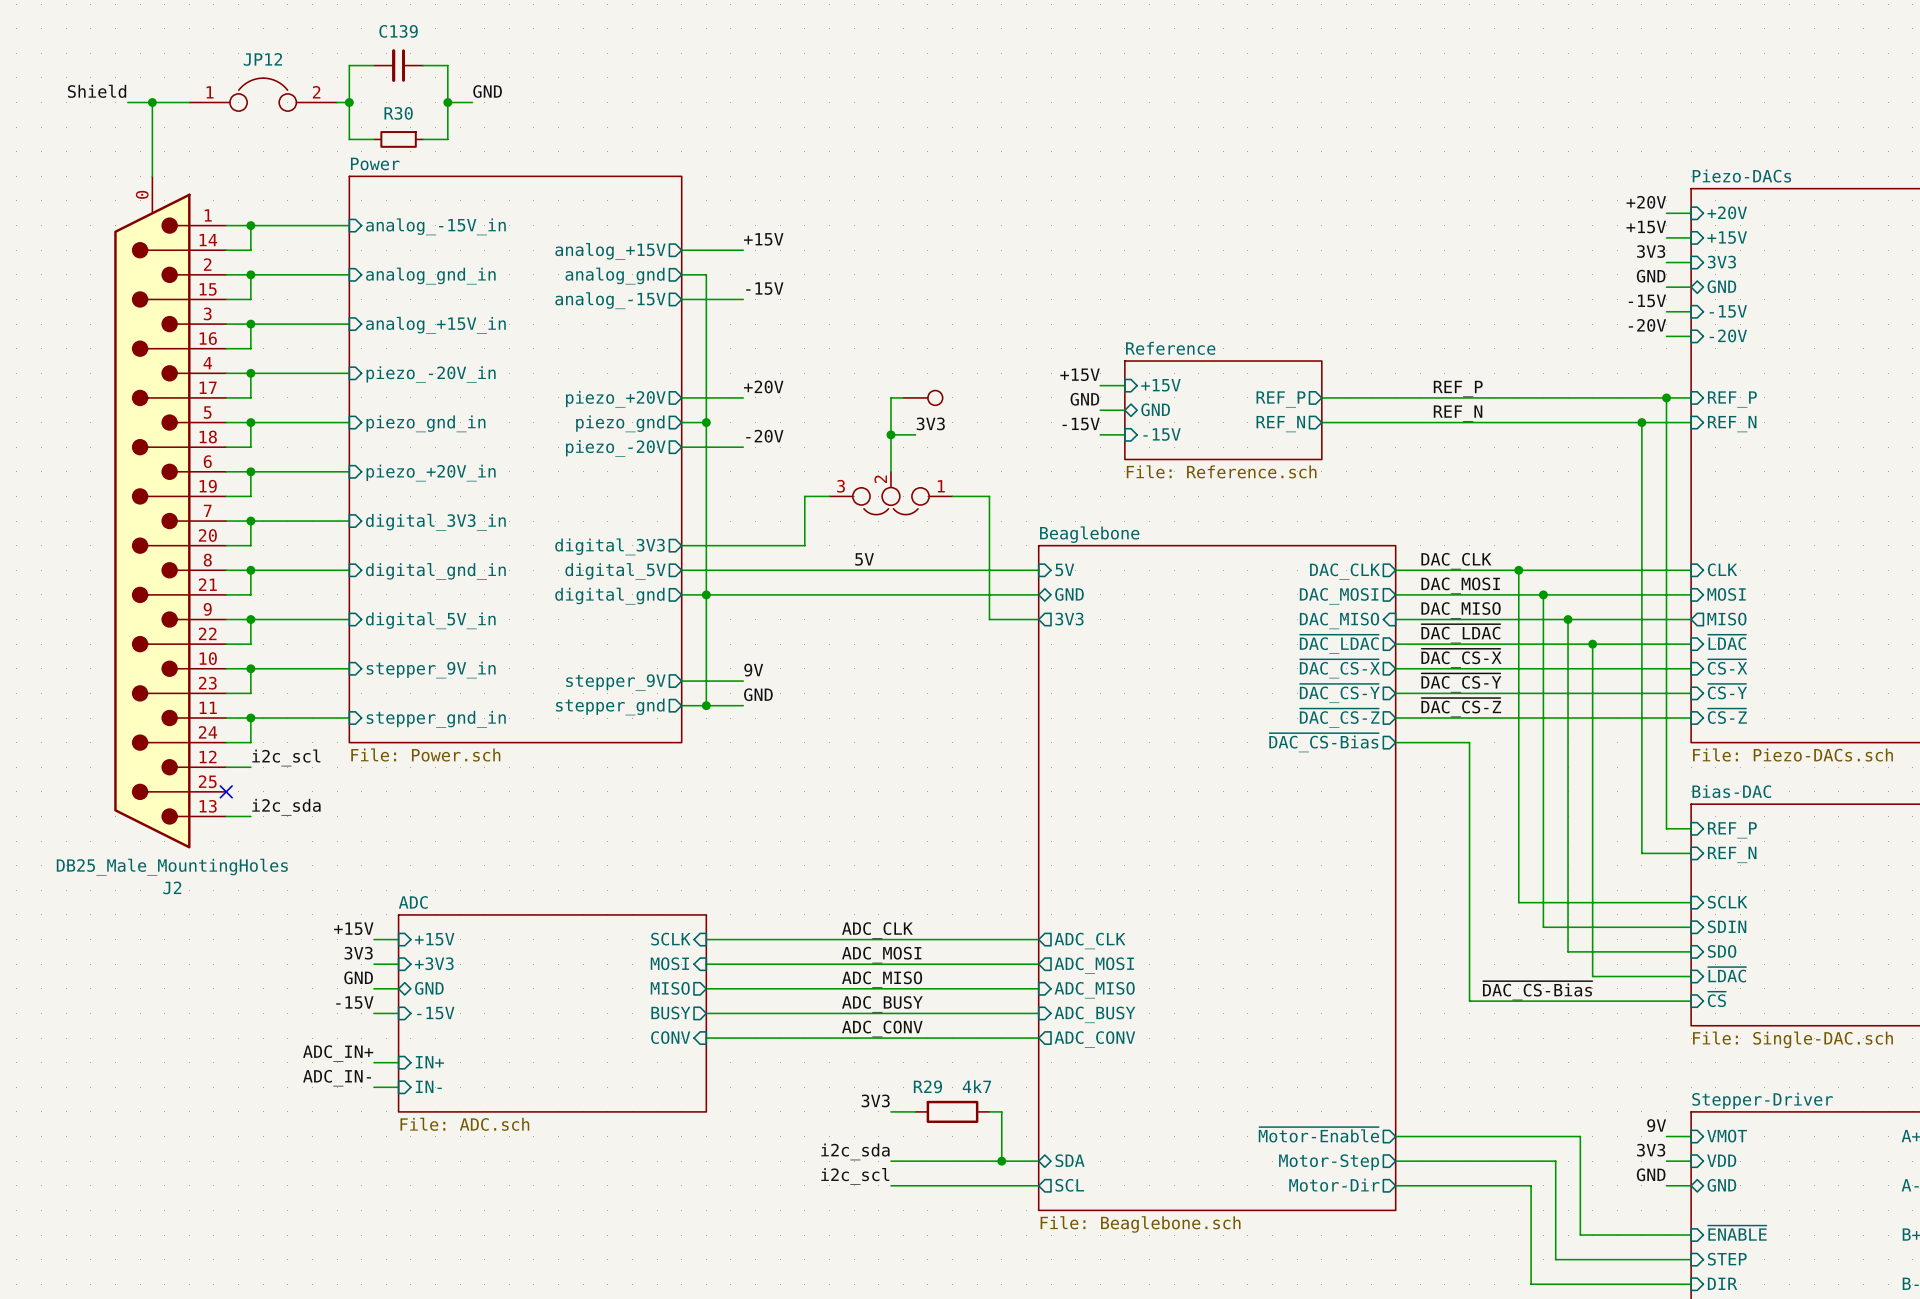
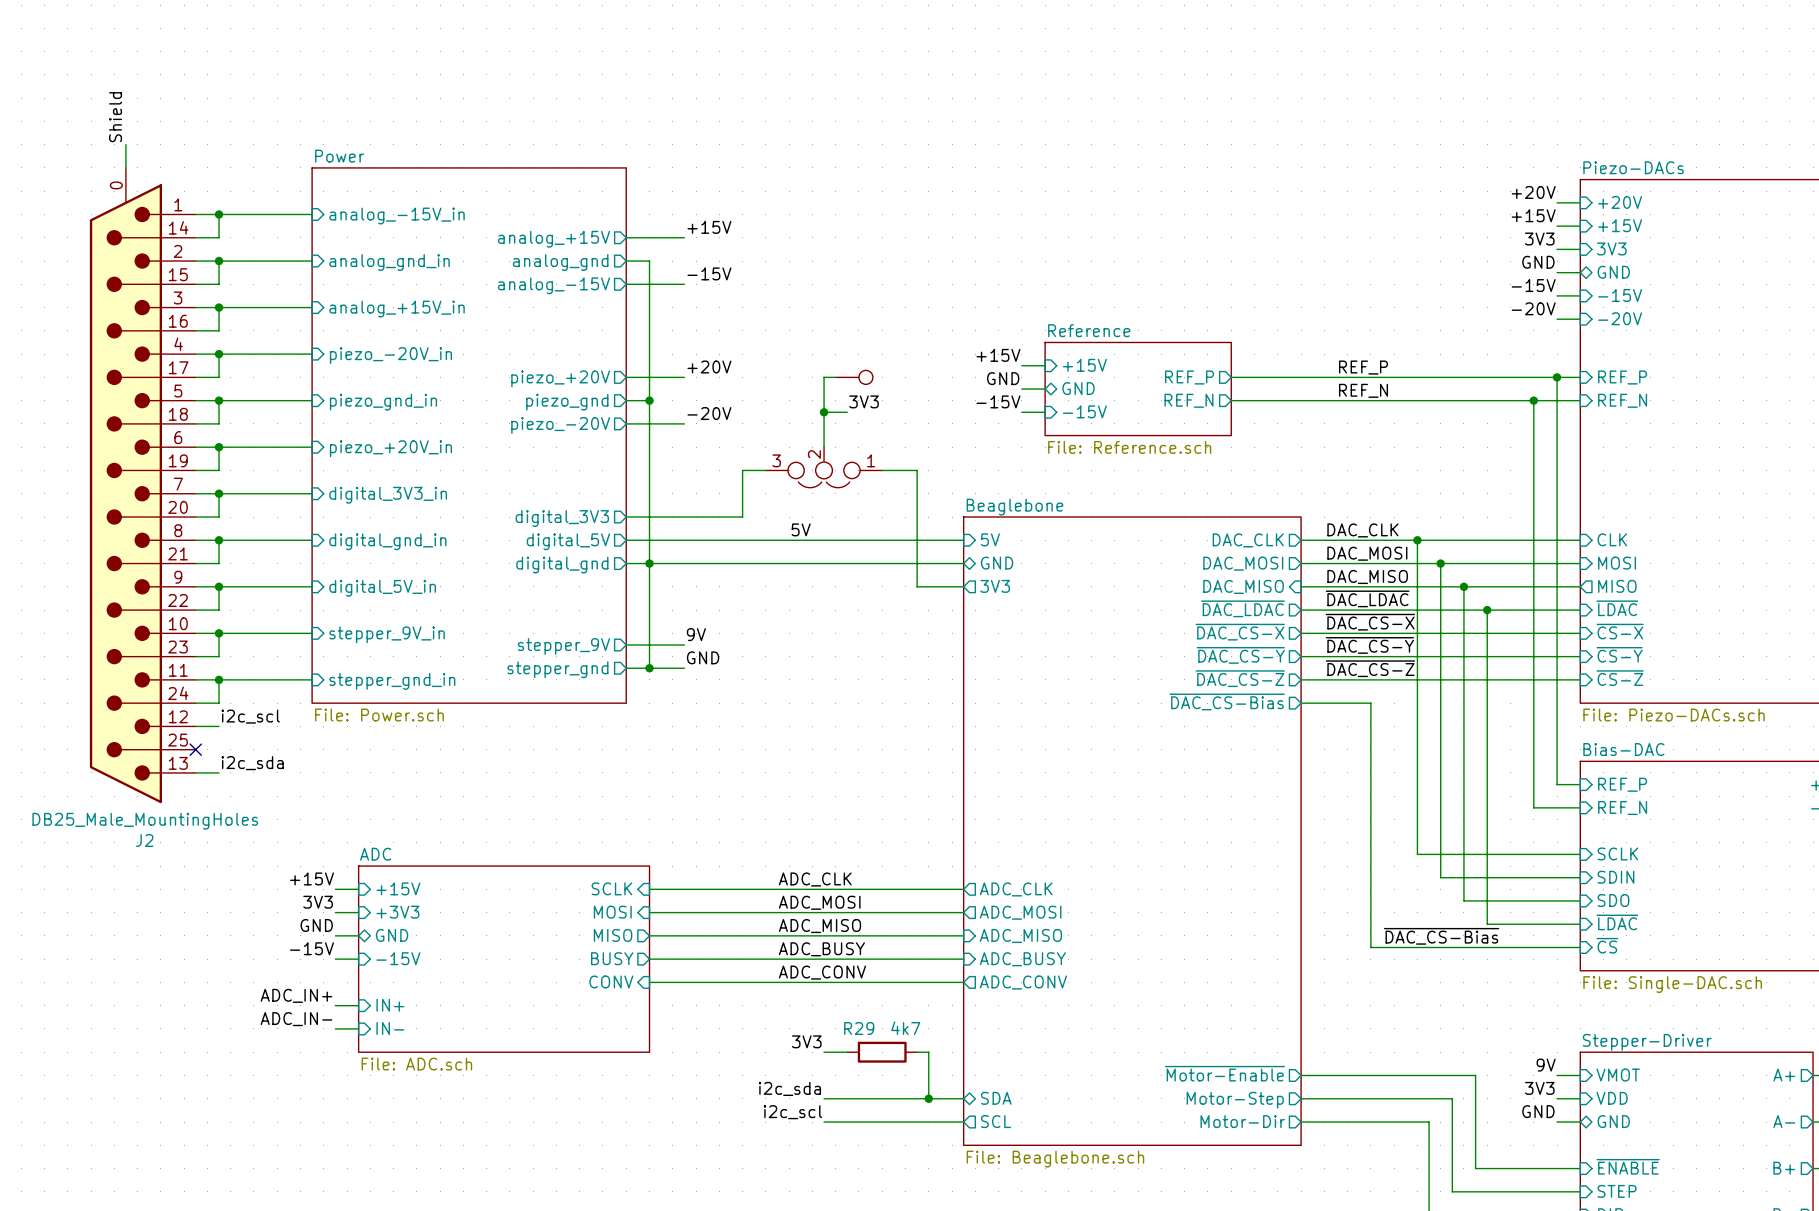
wire: (373, 65) (349, 65) (349, 139) (373, 139) -> none
C139: (398, 65) -> none
wire: (423, 65) (447, 65) (447, 139) (423, 139) -> none
label rotation: 0° (97, 91) -> 90° counterclockwise (115, 117)
label: GND (487, 91) -> none
JP12: (263, 94) -> none
wire: (127, 102) (189, 102) -> none
wire: (152, 102) (152, 151) -> none
junction: (152, 102) -> none
wire: (337, 102) (349, 102) -> none
junction: (349, 102) -> none
wire: (447, 102) (472, 102) -> none
junction: (447, 102) -> none
R30: (398, 139) -> none

